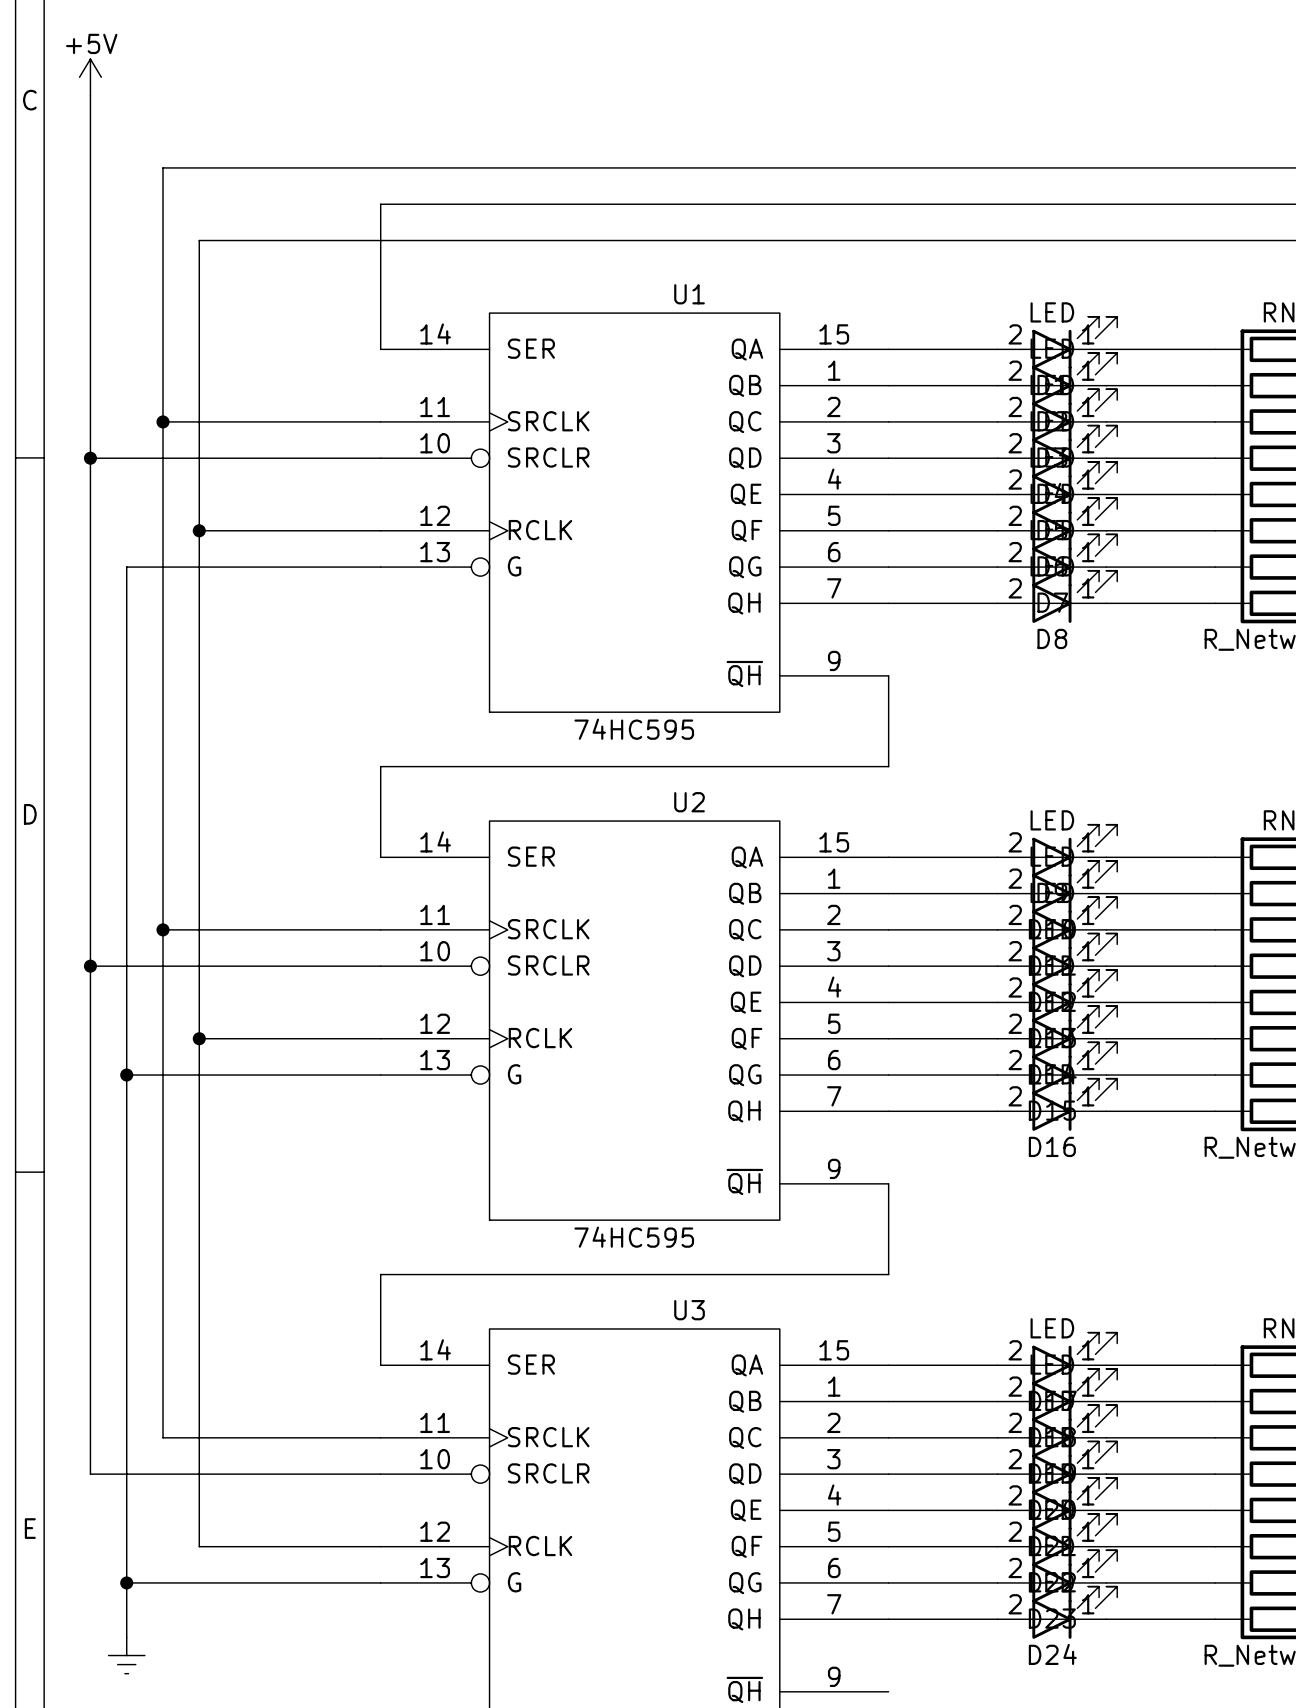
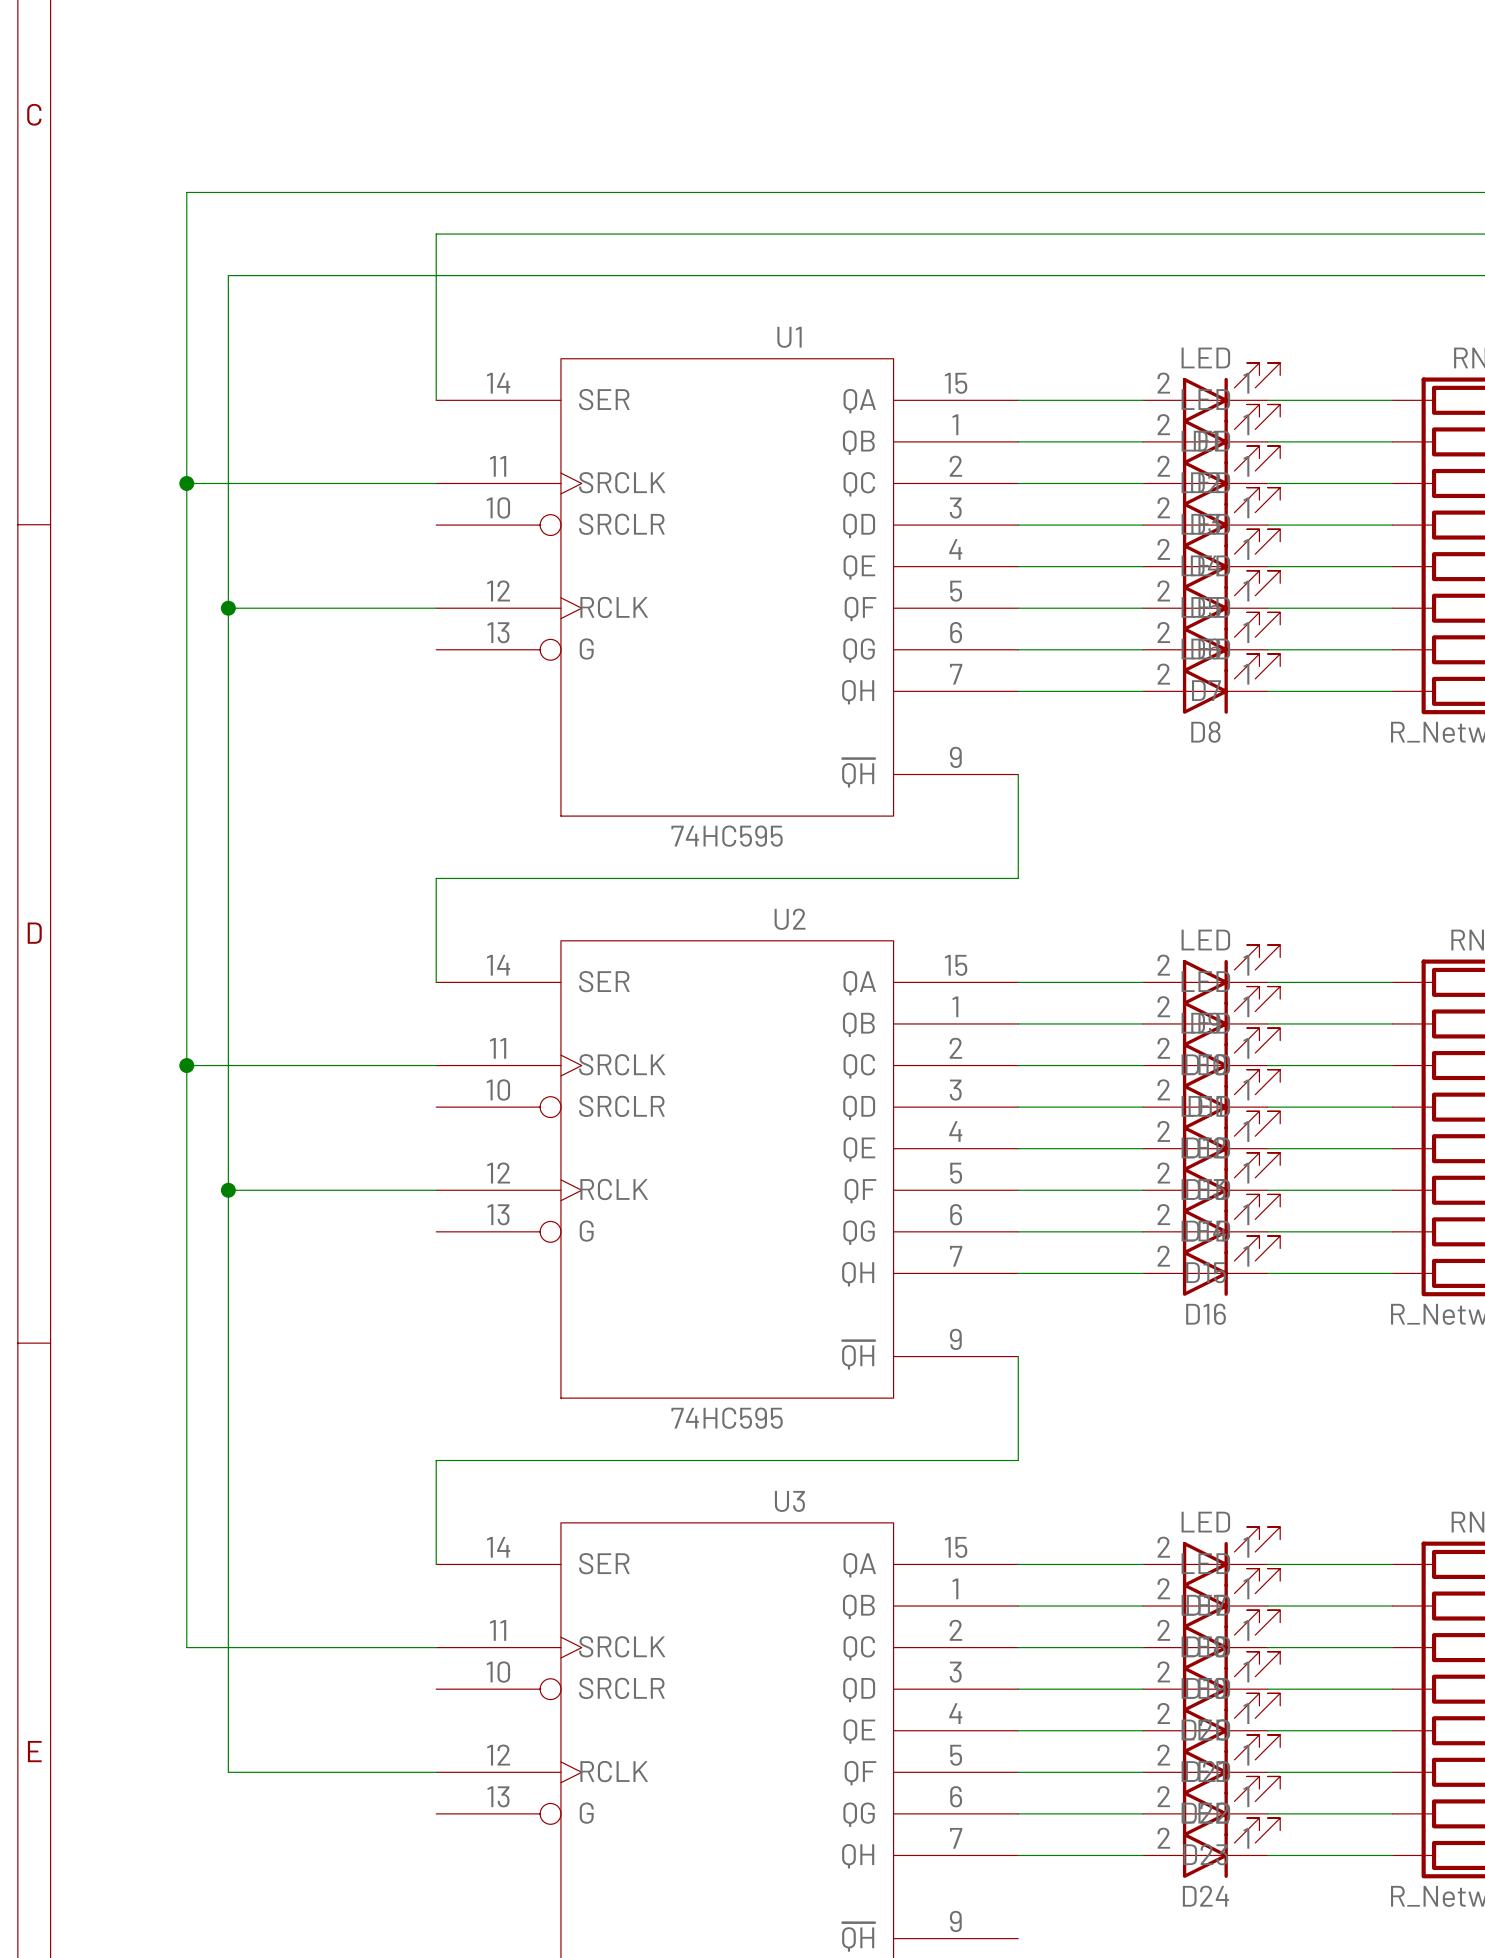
power symbol: +5V (90, 77) -> none
wire: (90, 95) (90, 1474) (380, 1474) -> none
wire: (90, 458) (380, 458) -> none
junction: (90, 458) -> none
wire: (380, 567) (126, 567) (126, 1637) -> none
wire: (90, 966) (380, 966) -> none
junction: (90, 966) -> none
wire: (126, 1075) (380, 1075) -> none
junction: (126, 1075) -> none
wire: (126, 1582) (380, 1582) -> none
junction: (126, 1582) -> none
power symbol: (126, 1655) -> none

